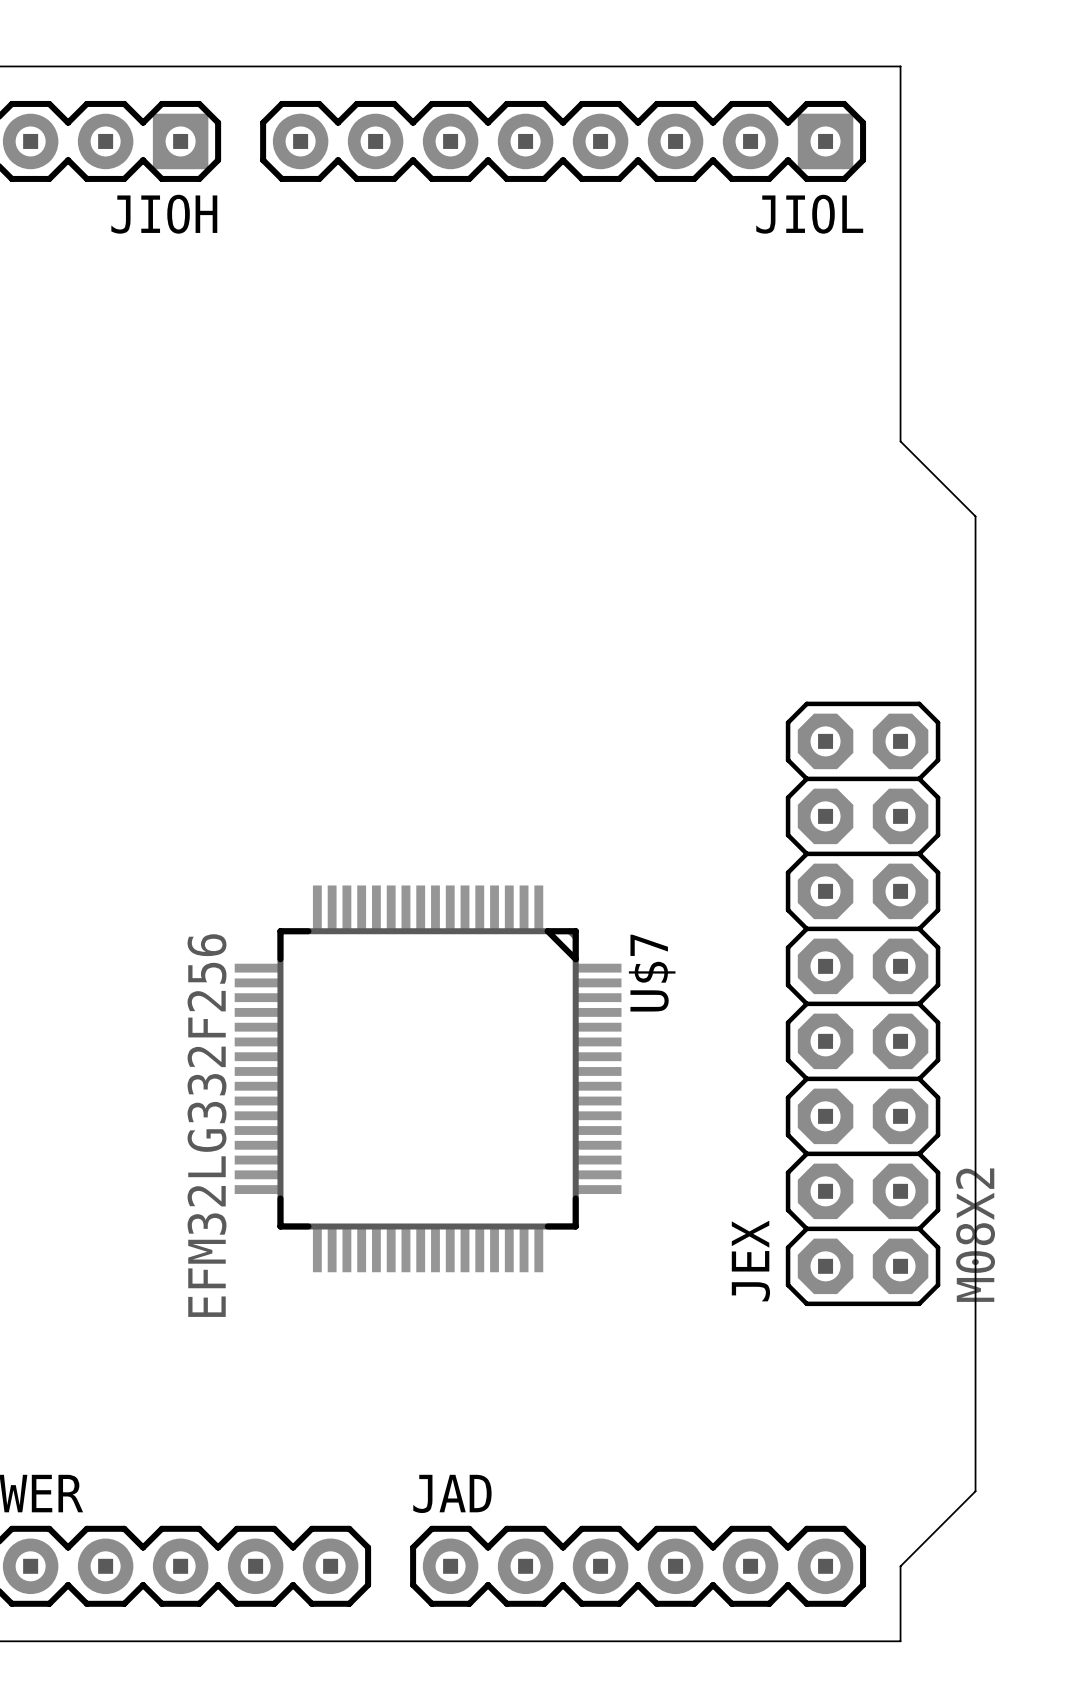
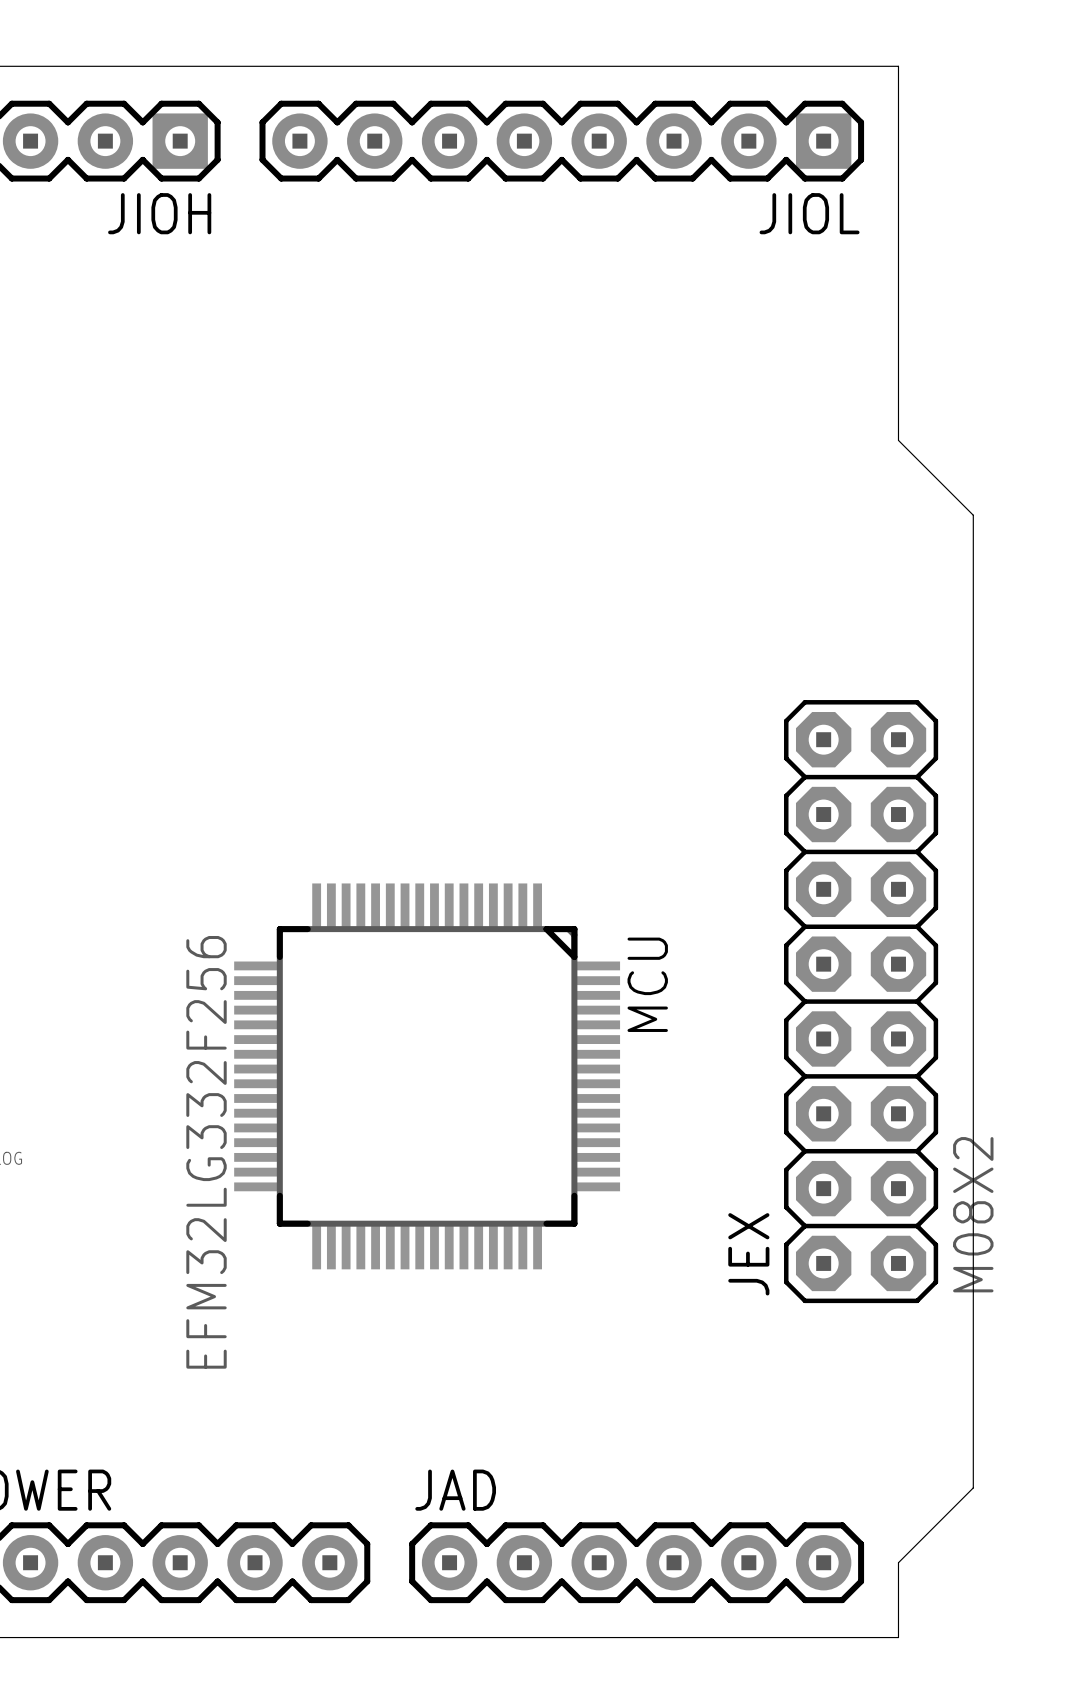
U$7 name: U$7 (652, 973) -> MCU (647, 984)

